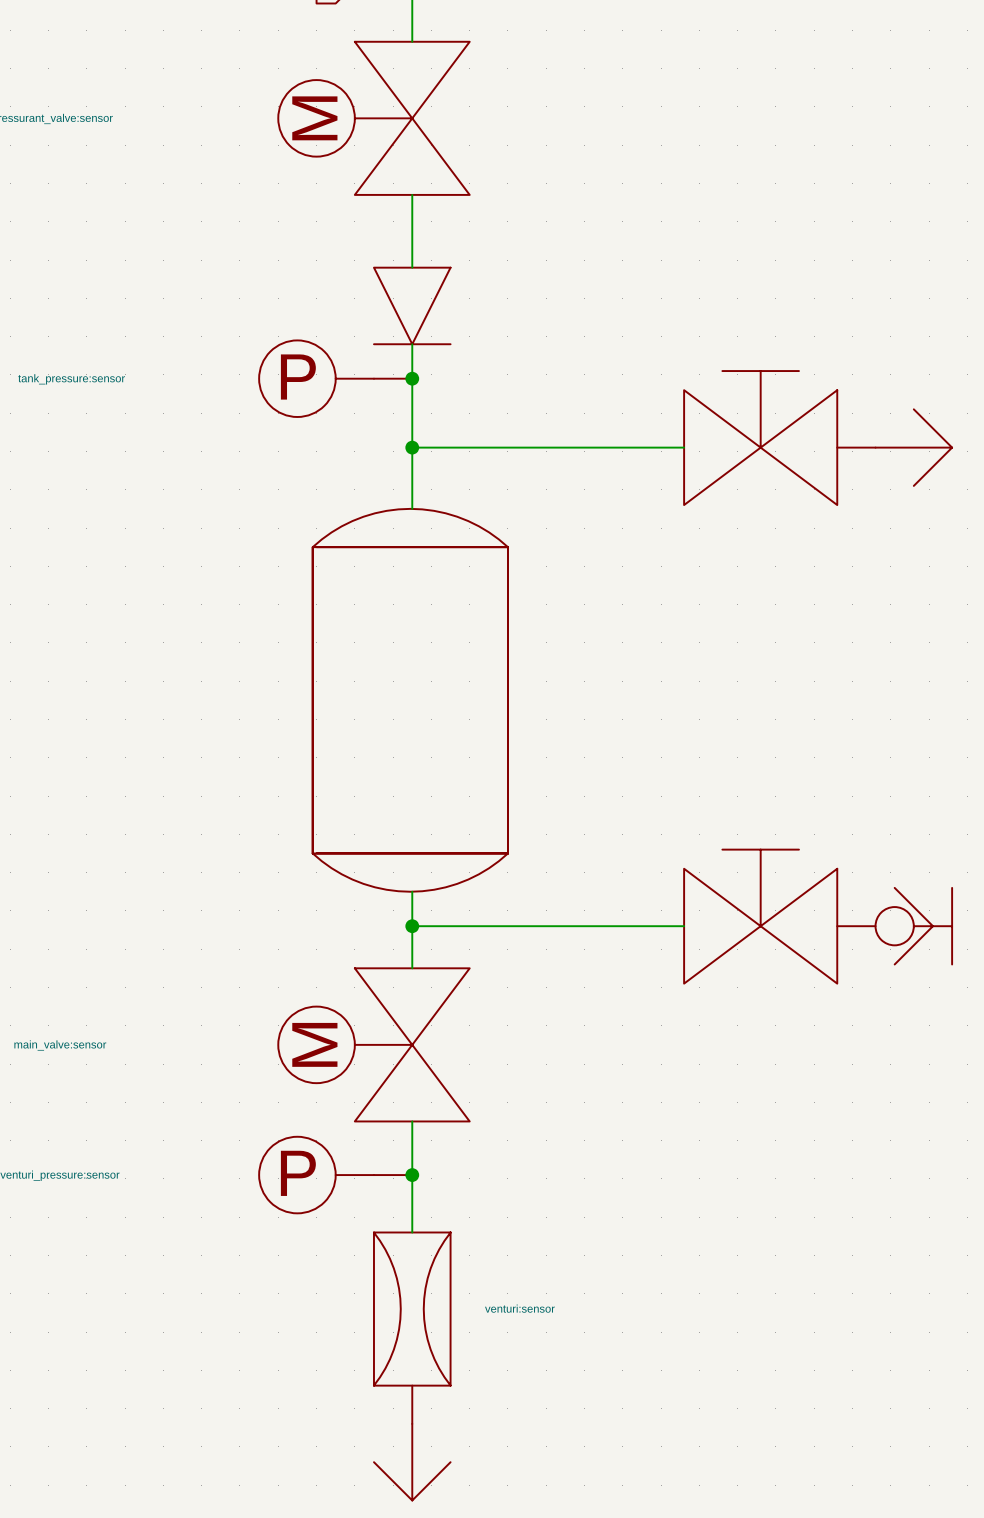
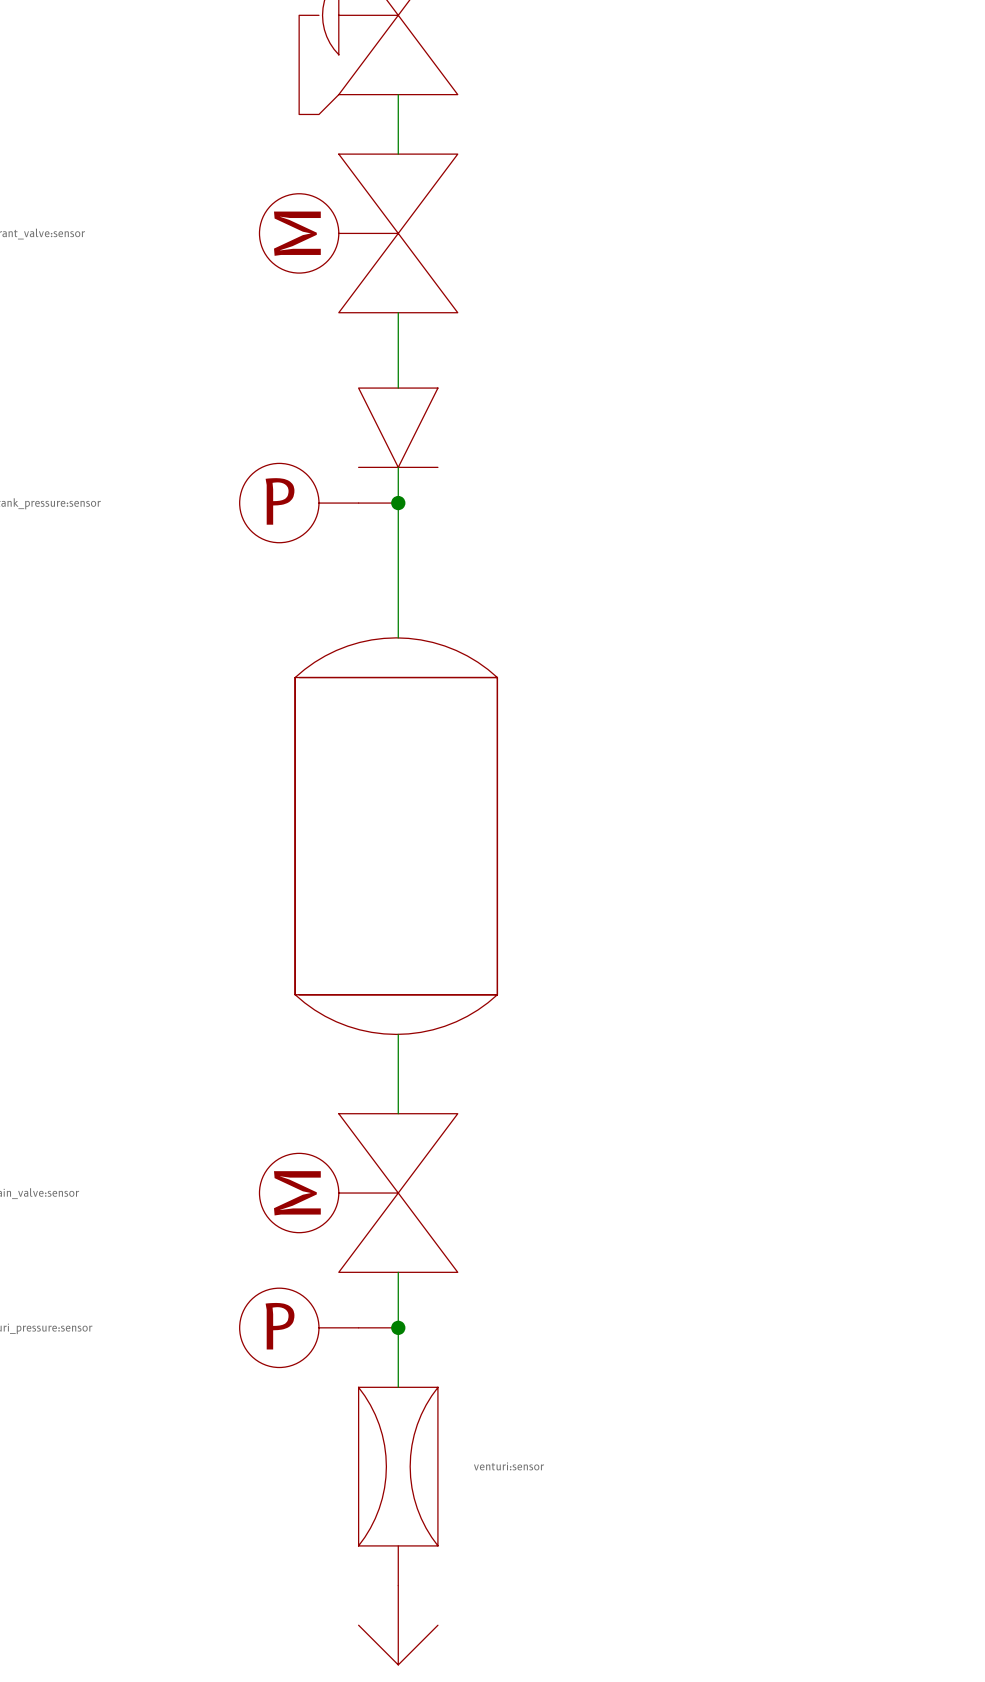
part: (760, 438) -> none
wire: (412, 447) (684, 447) -> none
junction: (412, 447) -> none
part: (894, 447) -> none
part: (760, 916) -> none
wire: (412, 926) (684, 926) -> none
junction: (412, 926) -> none
part: (894, 926) -> none

